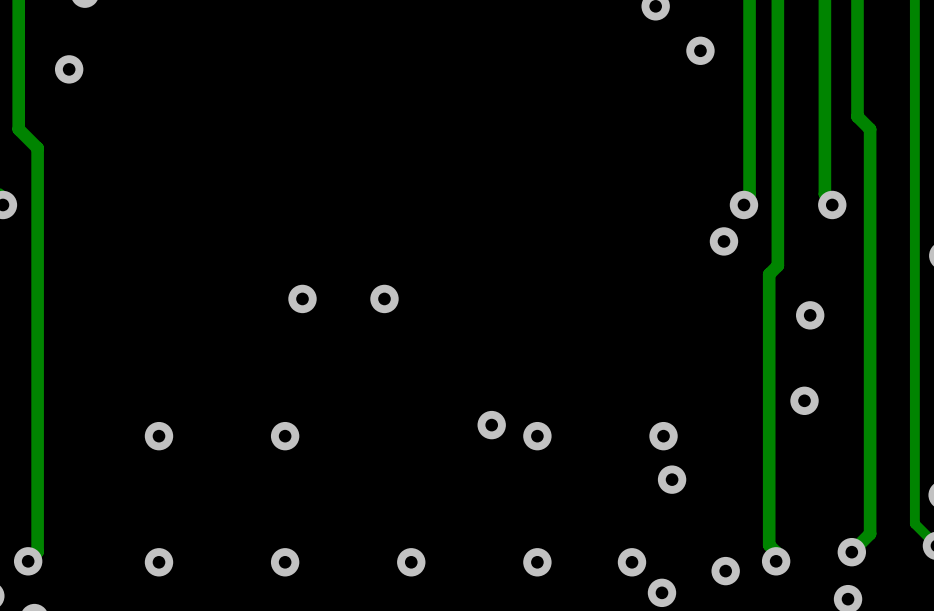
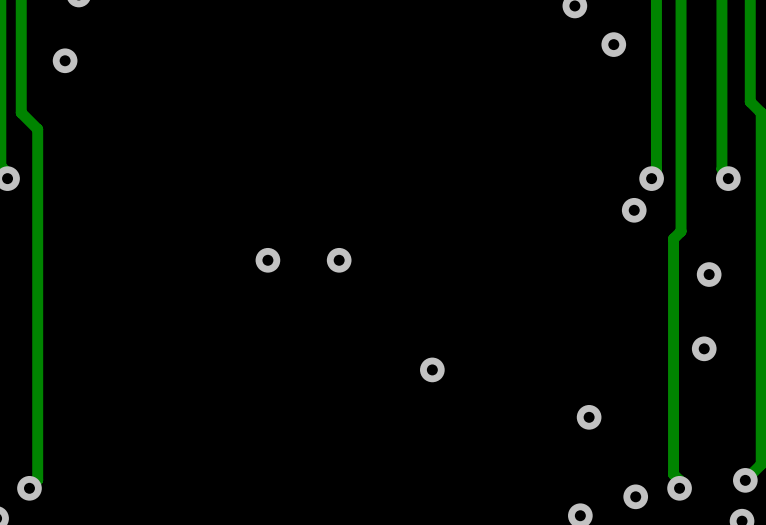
via: (158, 436) -> none
via: (285, 436) -> none
via: (537, 436) -> none
via: (663, 436) -> none
via: (158, 562) -> none
via: (285, 562) -> none
via: (411, 562) -> none
via: (537, 562) -> none
via: (632, 562) -> none

